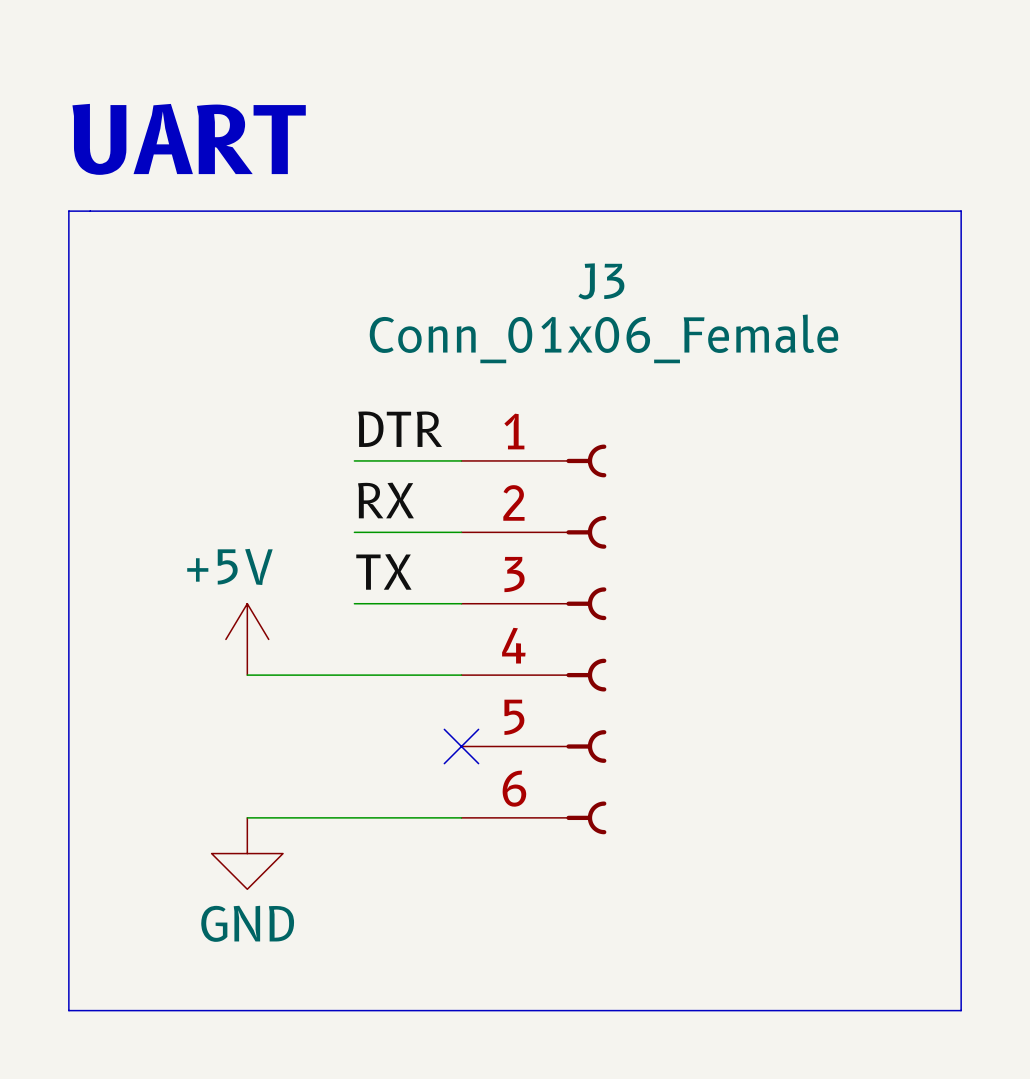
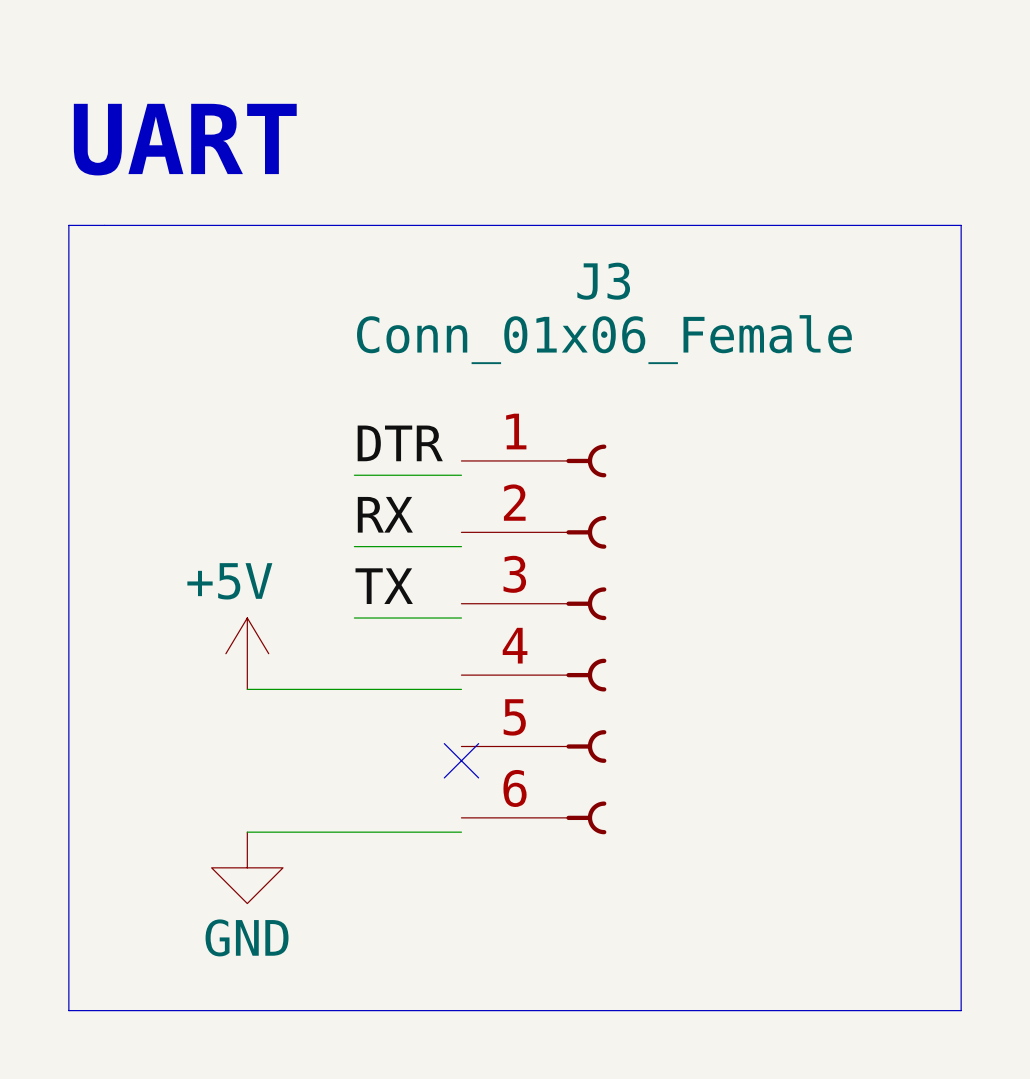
line: (68, 225) (68, 211) (961, 211) (961, 225) -> (68, 225) (961, 225)
label position: DTR (400, 429) -> DTR (400, 443)
wire: (354, 460) (461, 460) -> (354, 475) (461, 475)
label position: RX (385, 500) -> RX (385, 514)
wire: (354, 532) (461, 532) -> (354, 546) (461, 546)
label position: TX (383, 571) -> TX (384, 586)
wire: (354, 603) (461, 603) -> (354, 618) (461, 618)
power symbol position: +5V (247, 639) -> +5V (247, 653)
wire: (247, 675) (461, 675) -> (247, 689) (461, 689)
no-connect mark position: (461, 746) -> (461, 760)
wire: (247, 817) (461, 817) -> (247, 832) (461, 832)
power symbol position: GND (247, 853) -> GND (247, 867)

